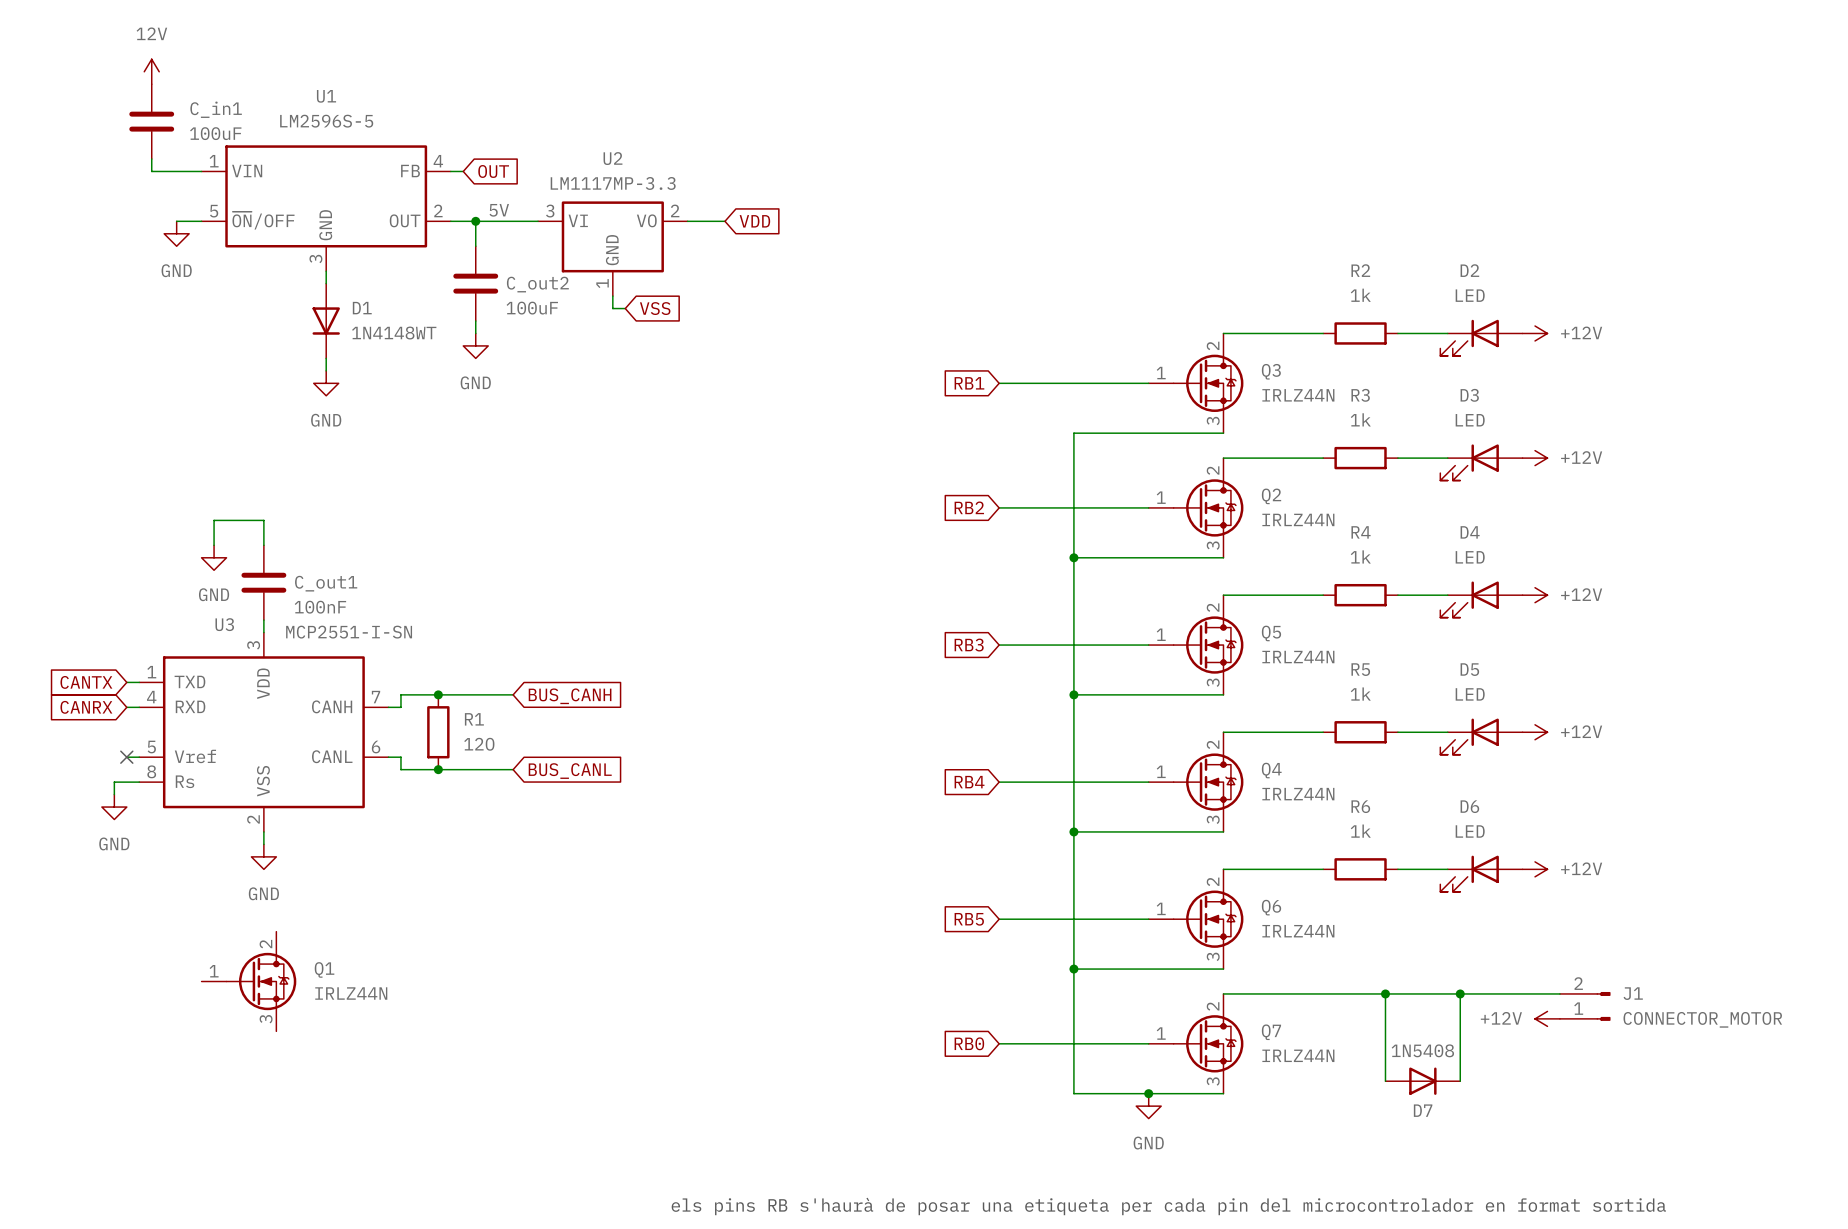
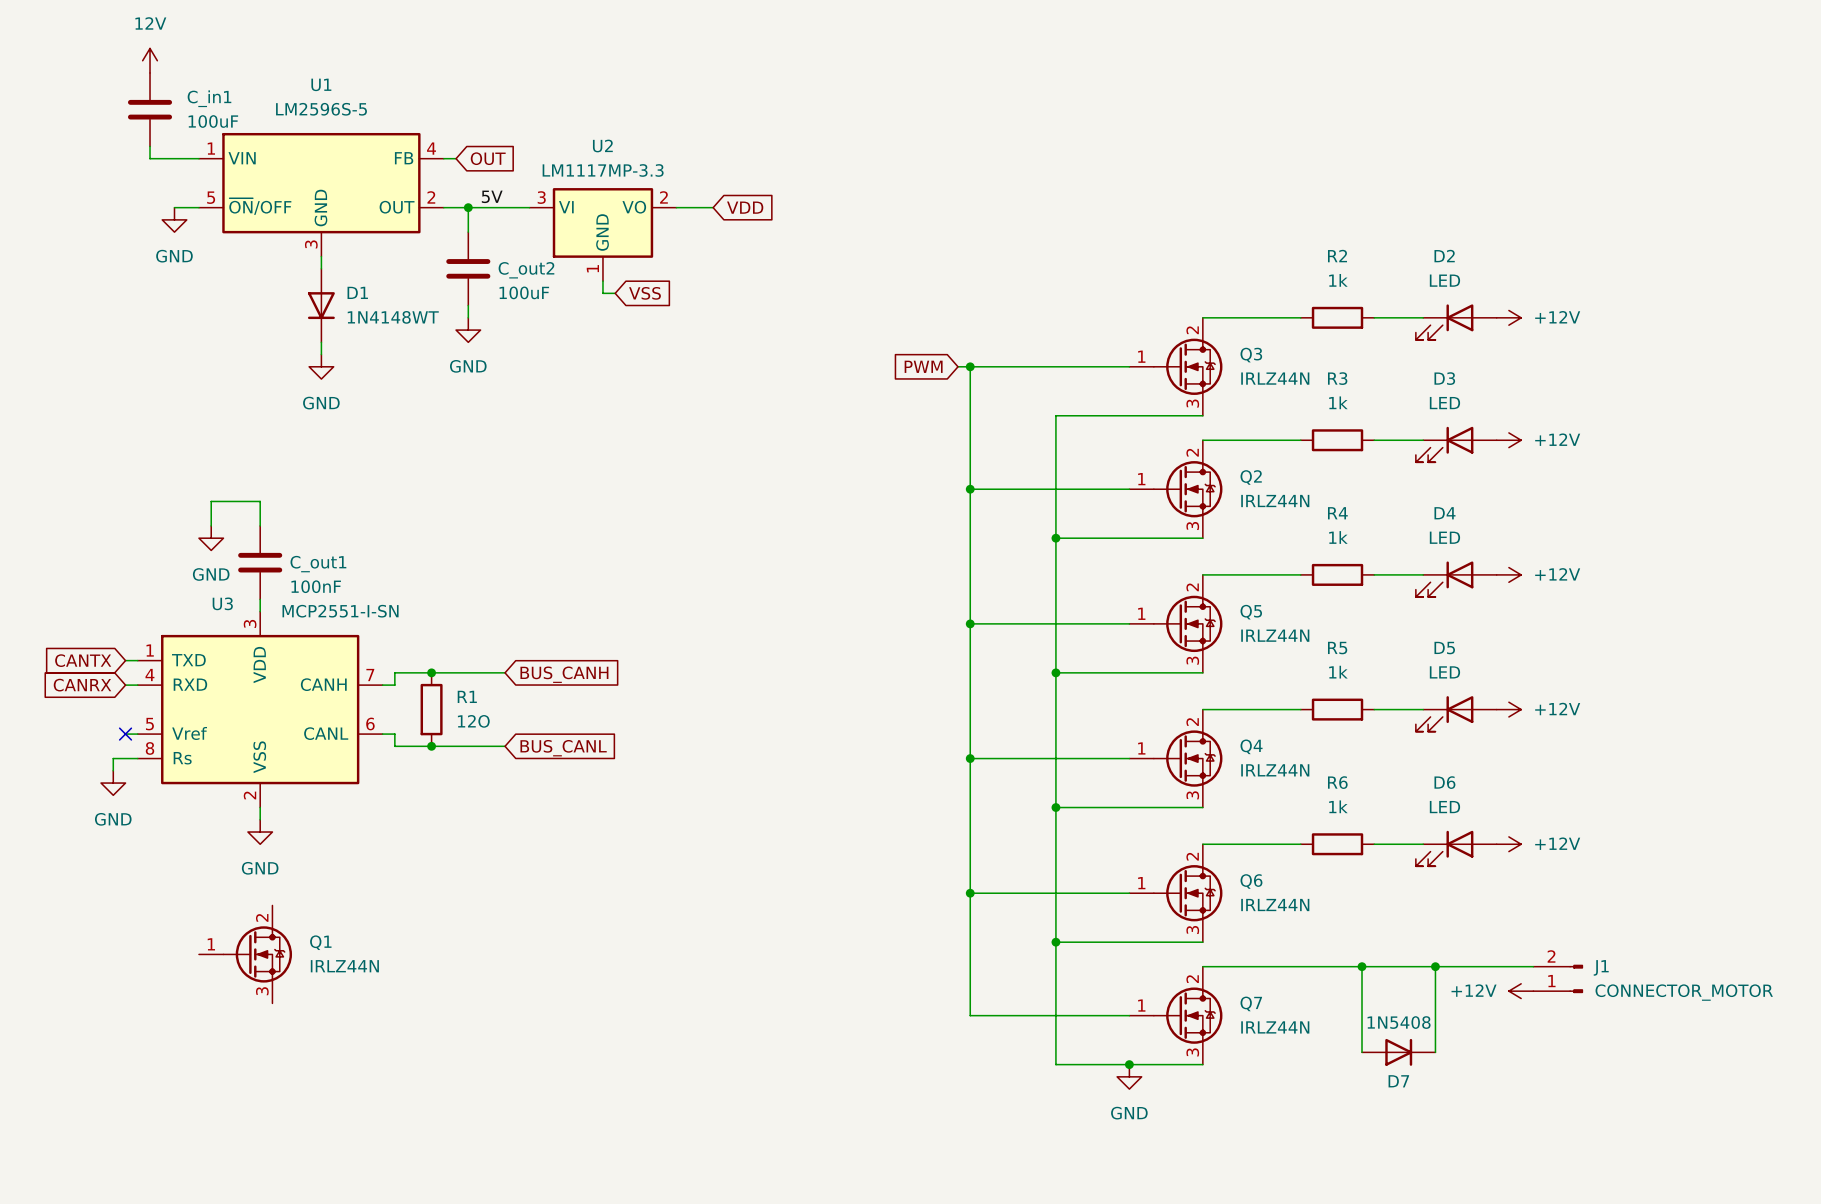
global label: none -> PWM (923, 366)
global label: RB1 (969, 383) -> none
wire: none -> (958, 366) (982, 366)
wire: none -> (970, 366) (970, 1015) (982, 1015)
junction: none -> (970, 366)
global label: RB2 (969, 507) -> none
wire: none -> (970, 489) (982, 489)
junction: none -> (970, 489)
global label: RB3 (969, 645) -> none
wire: none -> (970, 623) (982, 623)
junction: none -> (970, 623)
global label: RB4 (969, 782) -> none
wire: none -> (970, 758) (982, 758)
junction: none -> (970, 758)
global label: RB5 (969, 919) -> none
wire: none -> (970, 893) (982, 893)
junction: none -> (970, 893)
global label: RB0 (969, 1043) -> none
text: els pins RB s'haurà de posar una etiqueta per cada pin del microcontrolador en format sortida (1168, 1206) -> none

